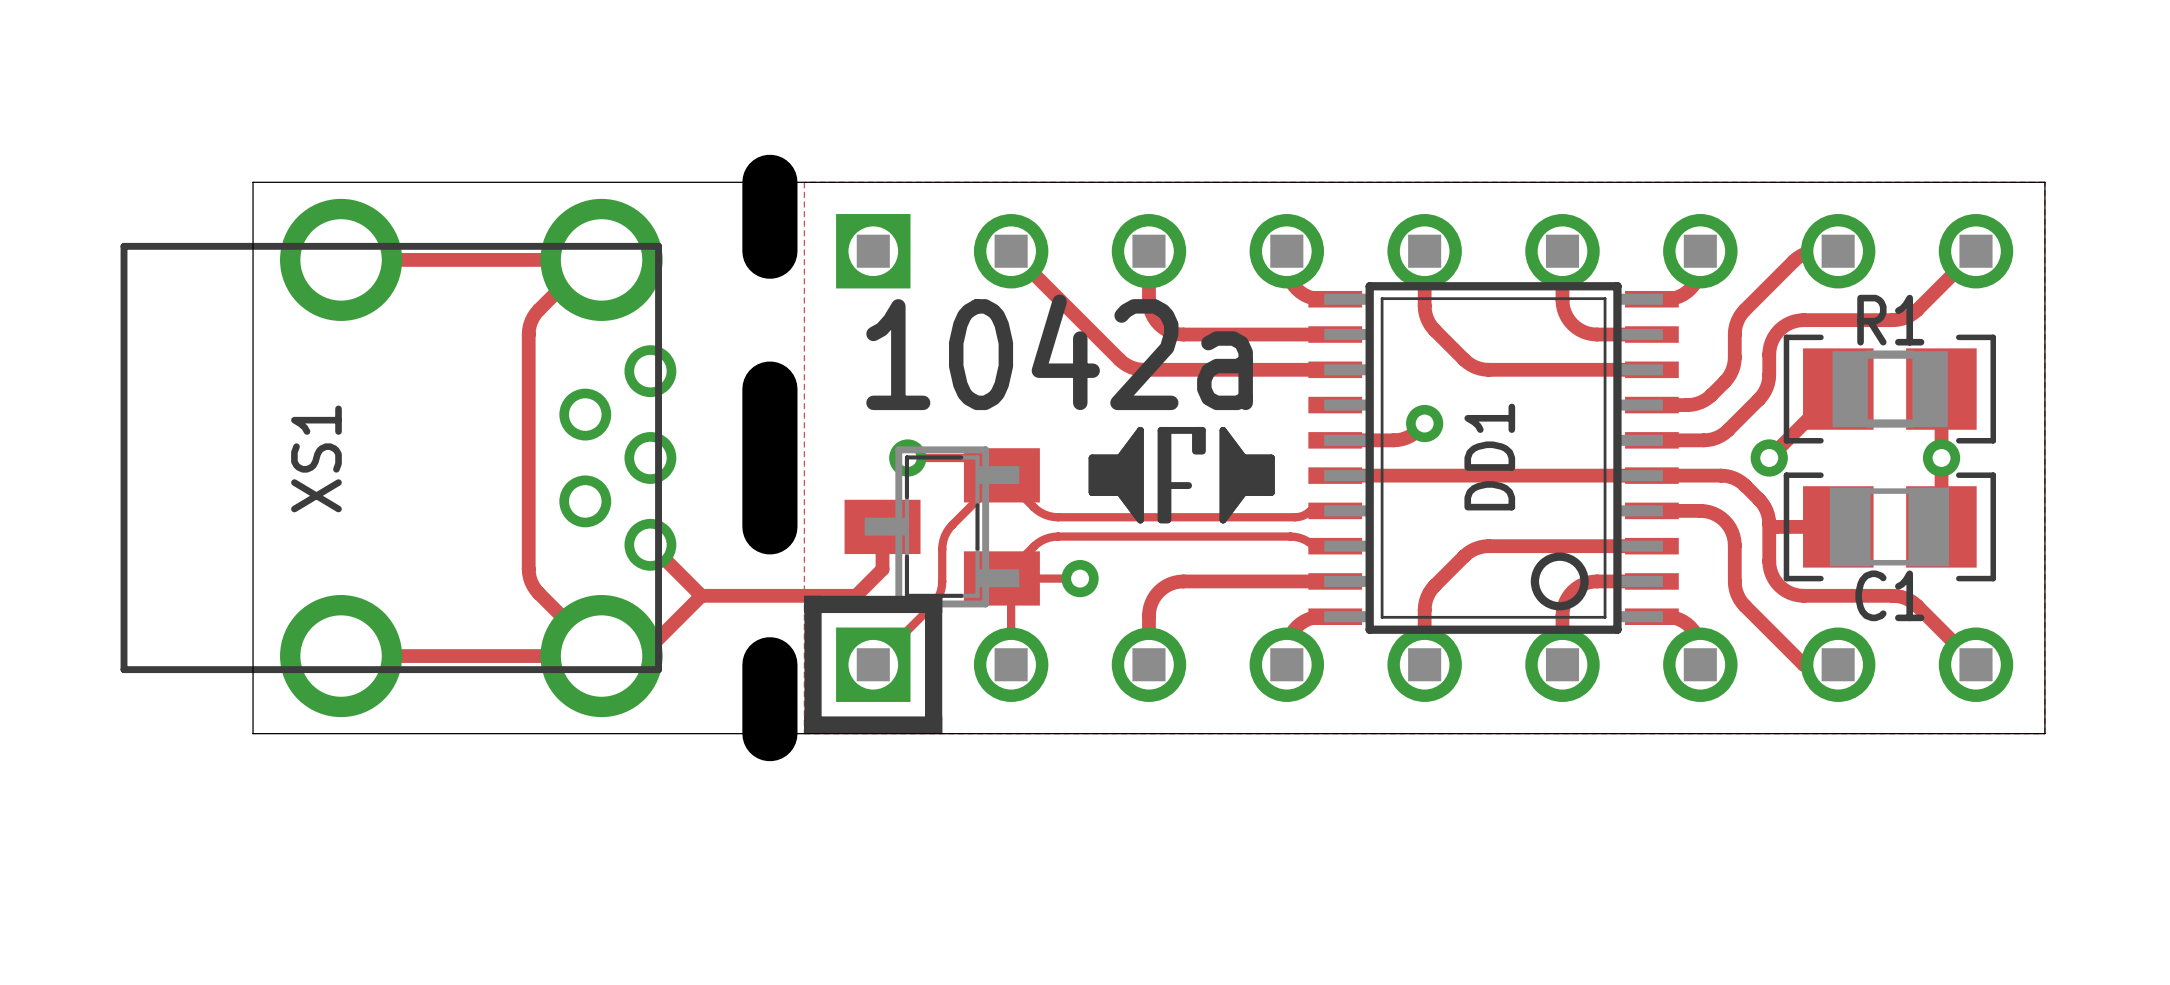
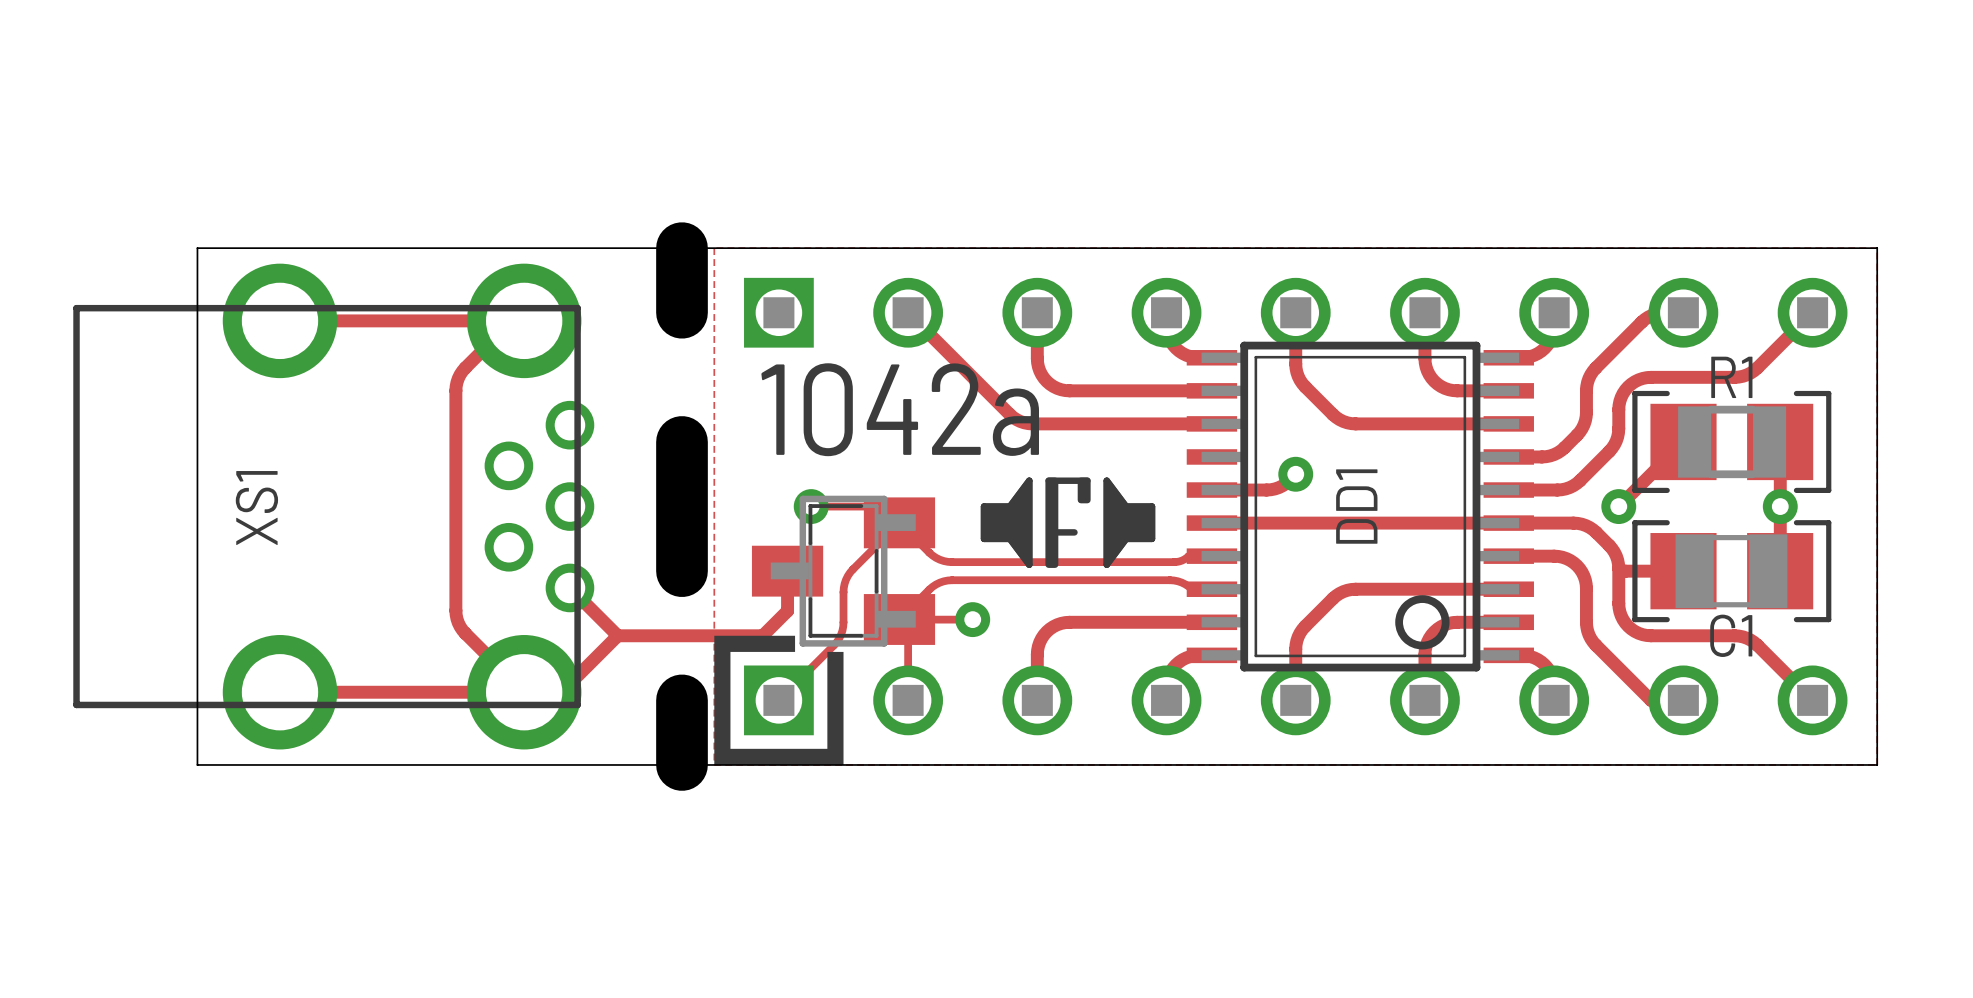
drawing shape: [804, 595, 943, 614] -> [730, 635, 796, 652]
drawing shape: [924, 595, 943, 734] -> [827, 651, 844, 765]
drawing shape: [804, 716, 943, 734] -> [730, 748, 828, 765]

